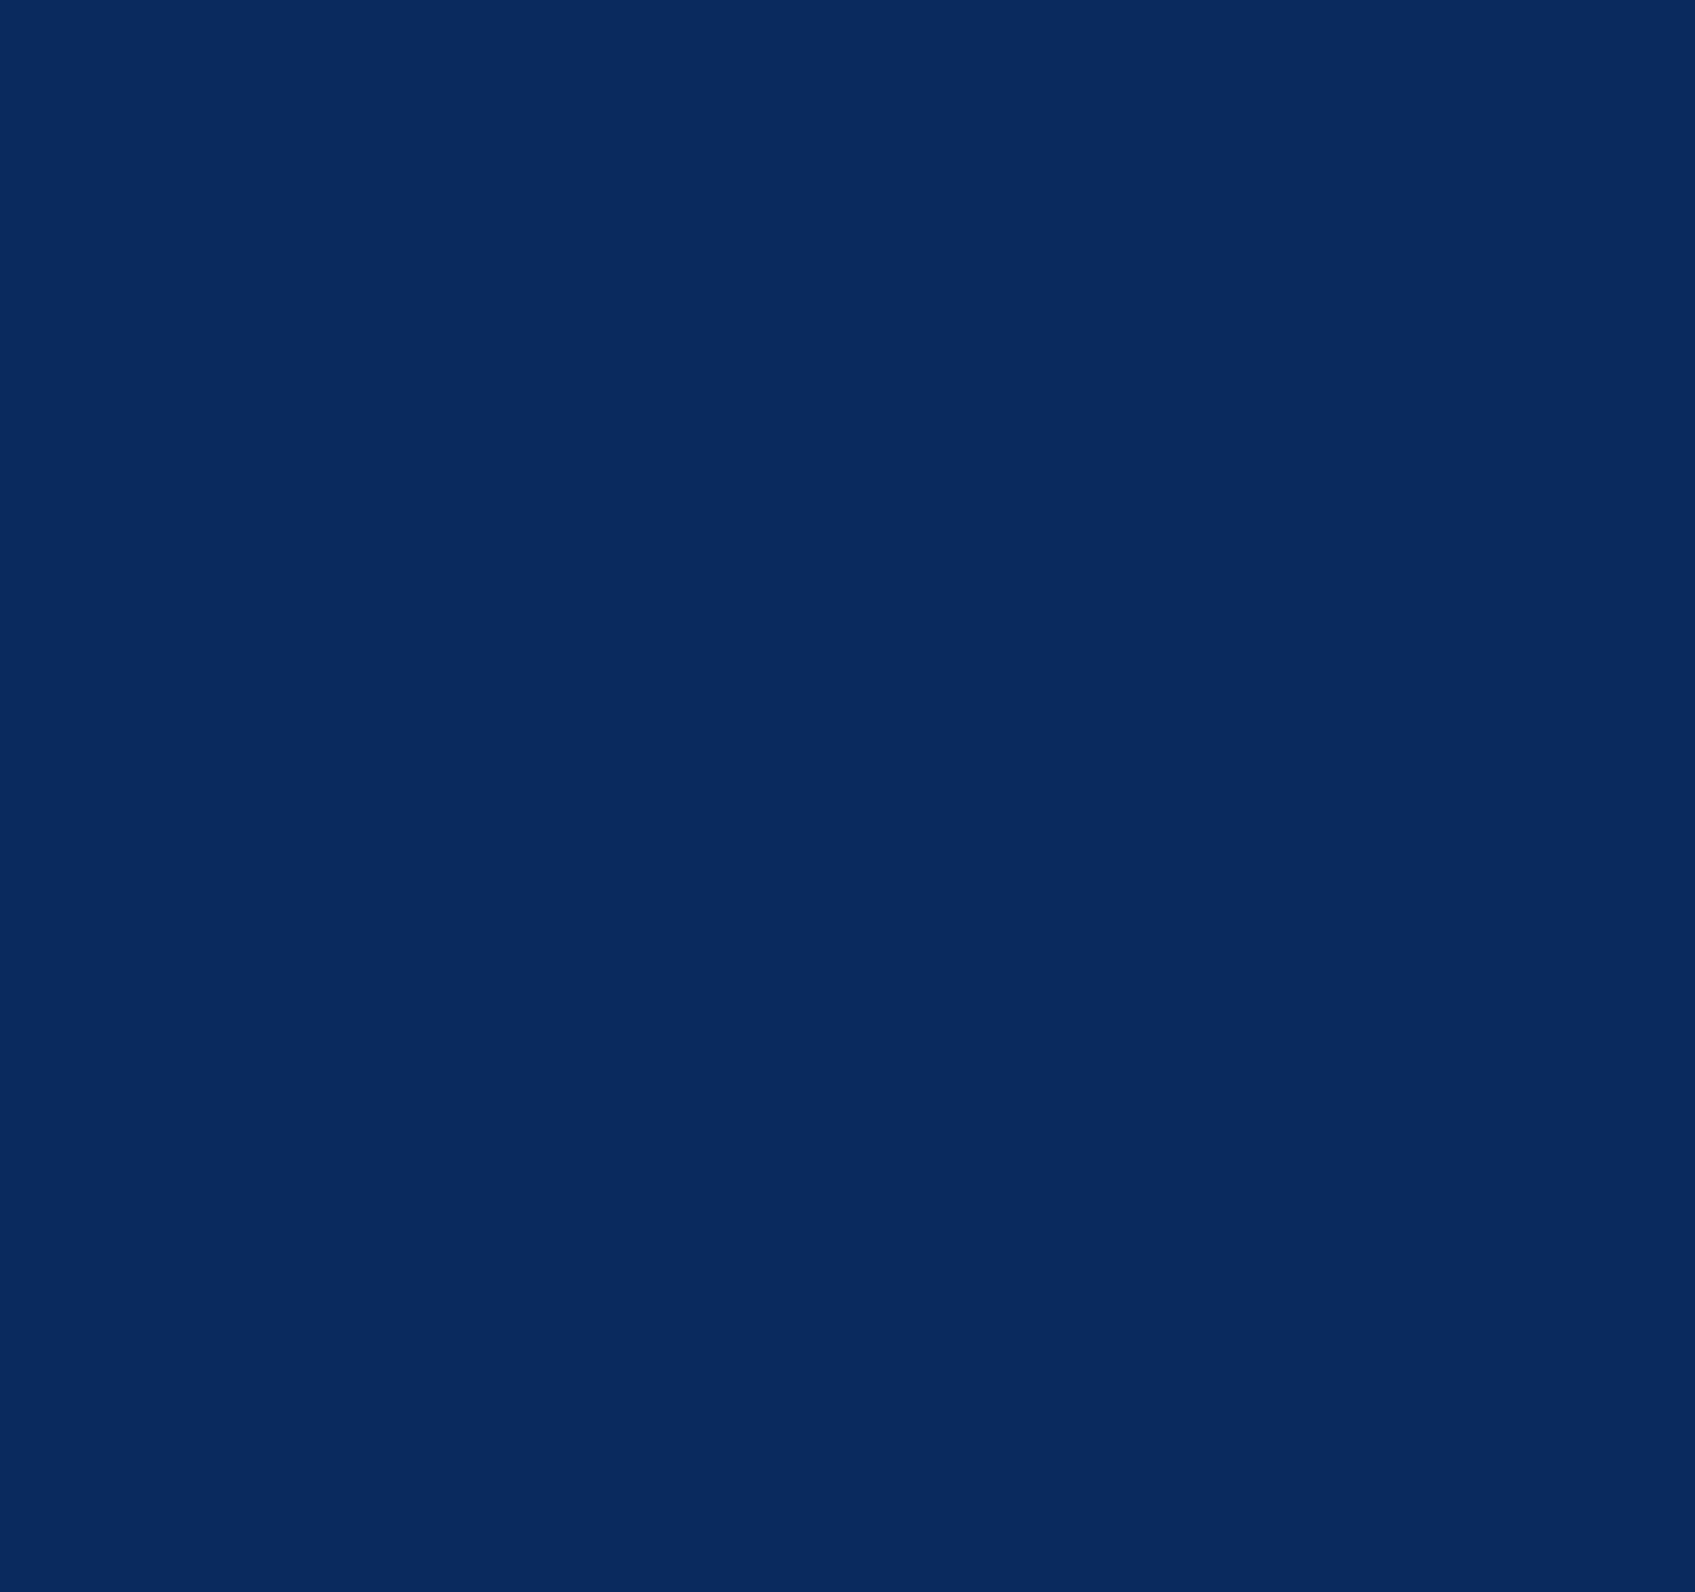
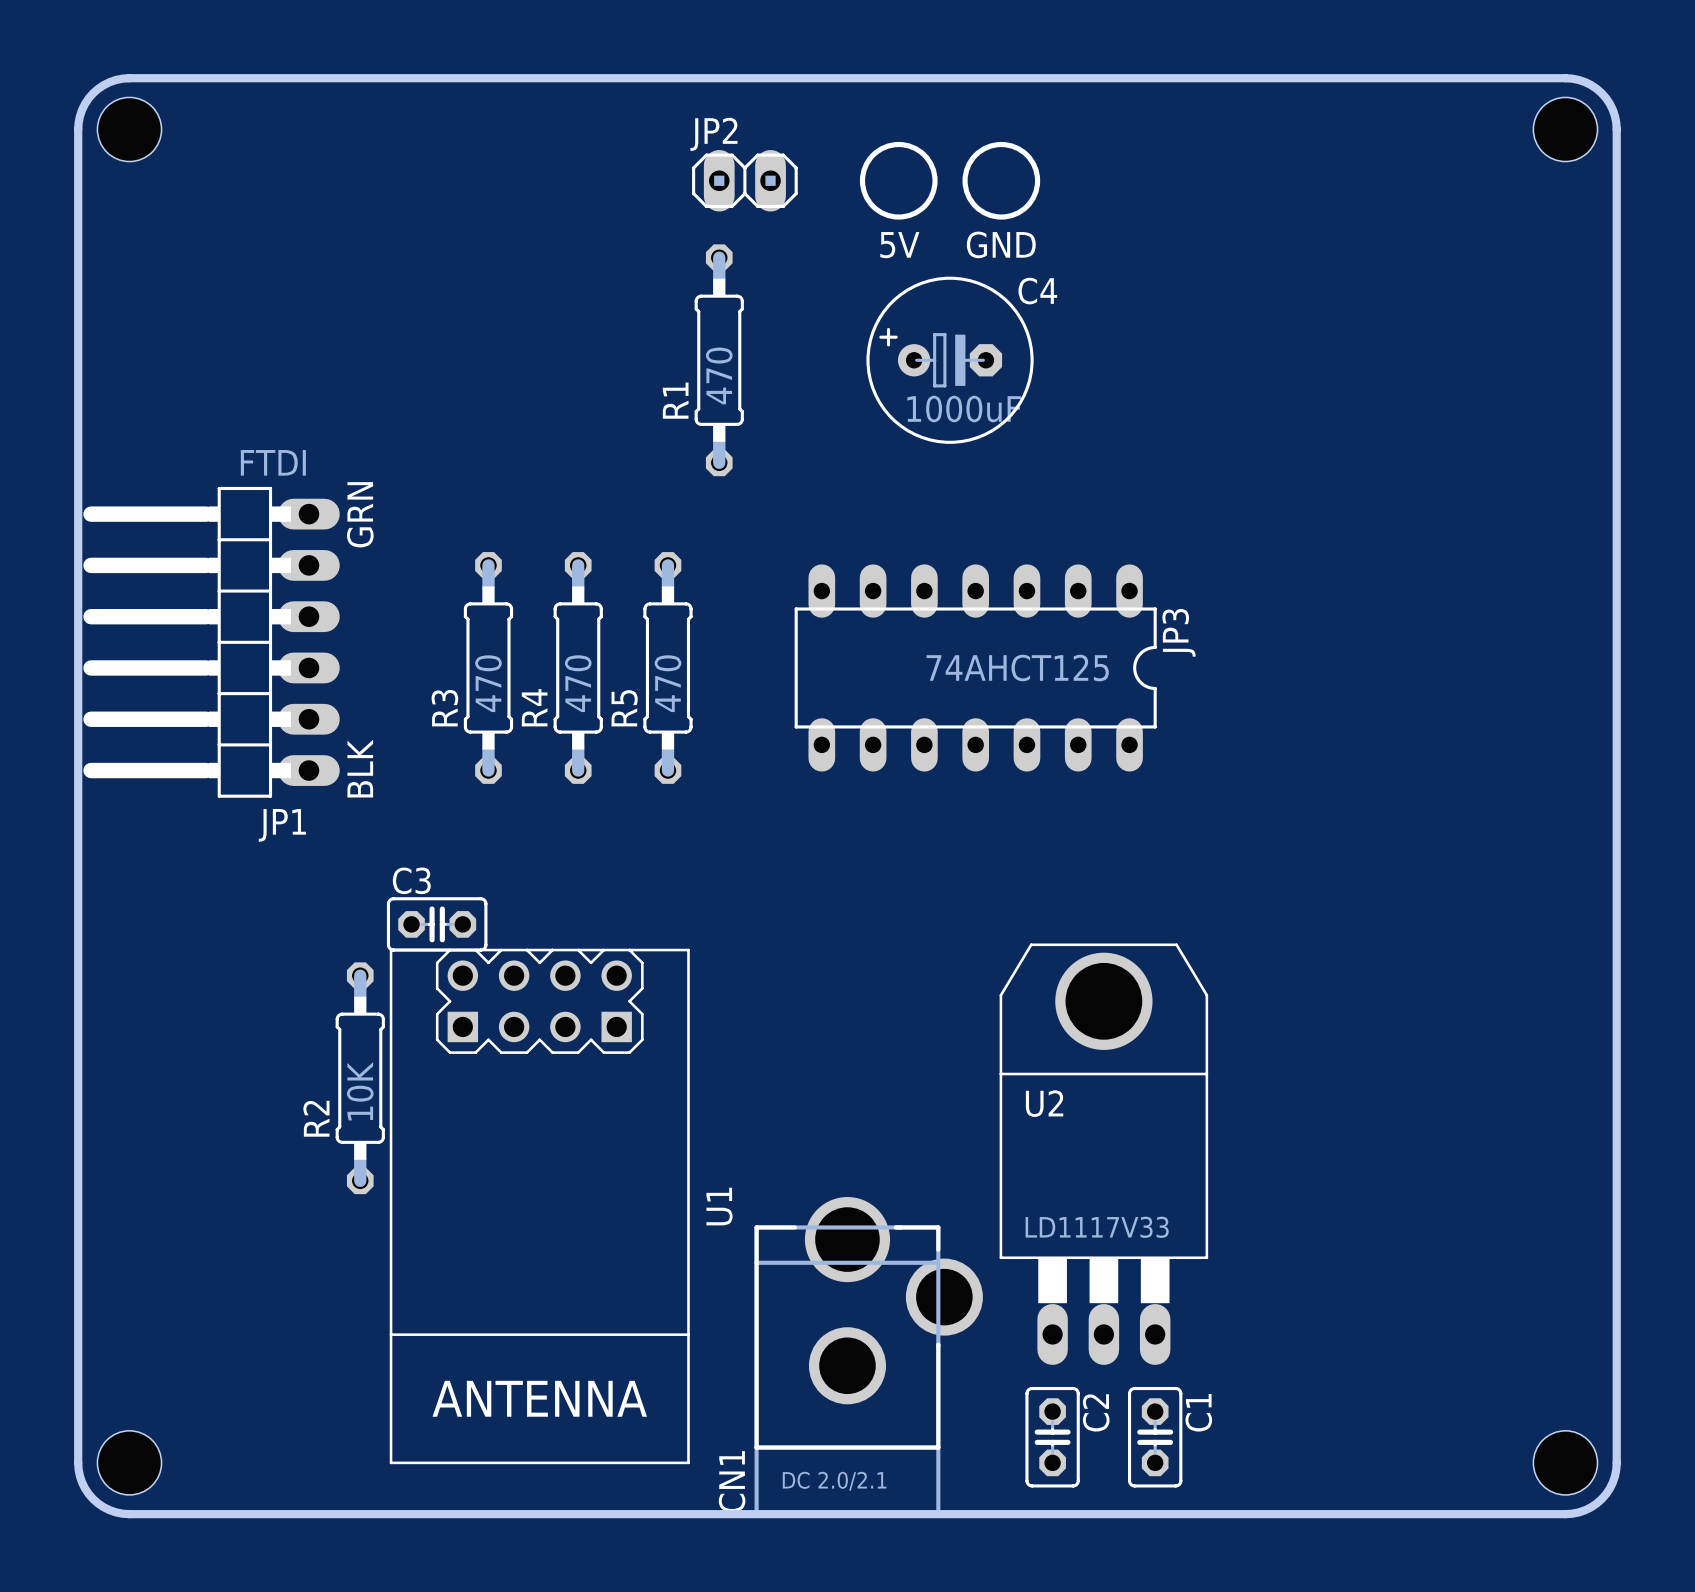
board edge: none -> (129, 78) (1565, 78) (1585, 82) (1601, 93) (1612, 109) (1616, 129) (1616, 1462) (1612, 1482) (1601, 1499) (1585, 1510) (1565, 1514) (129, 1514) (109, 1510) (93, 1499) (82, 1482) (78, 1462) (78, 129) (82, 109) (93, 93) (109, 82) (129, 78)
hole: none -> (129, 129)
hole: none -> (1565, 129)
drawing: none -> [859, 141, 938, 220]
drawing: none -> [962, 141, 1041, 220]
JP2: none -> (744, 180)
text: none -> 5V (899, 245)
text: none -> GND (1001, 244)
R1: none -> 470 (719, 360)
C4: none -> 1000uF (950, 360)
text: none -> GRN (360, 514)
JP1: none -> FTDI (211, 642)
R3: none -> 470 (488, 667)
R4: none -> 470 (578, 667)
R5: none -> 470 (667, 667)
JP3: none -> 74AHCT125 (975, 667)
text: none -> BLK (360, 768)
C3: none -> (437, 924)
R2: none -> 10K (360, 1078)
U2: none -> LD1117V33 (1103, 1154)
U1: none -> (539, 1206)
CN1: none -> (868, 1356)
C2: none -> (1052, 1437)
C1: none -> (1155, 1437)
hole: none -> (129, 1462)
hole: none -> (1565, 1462)

